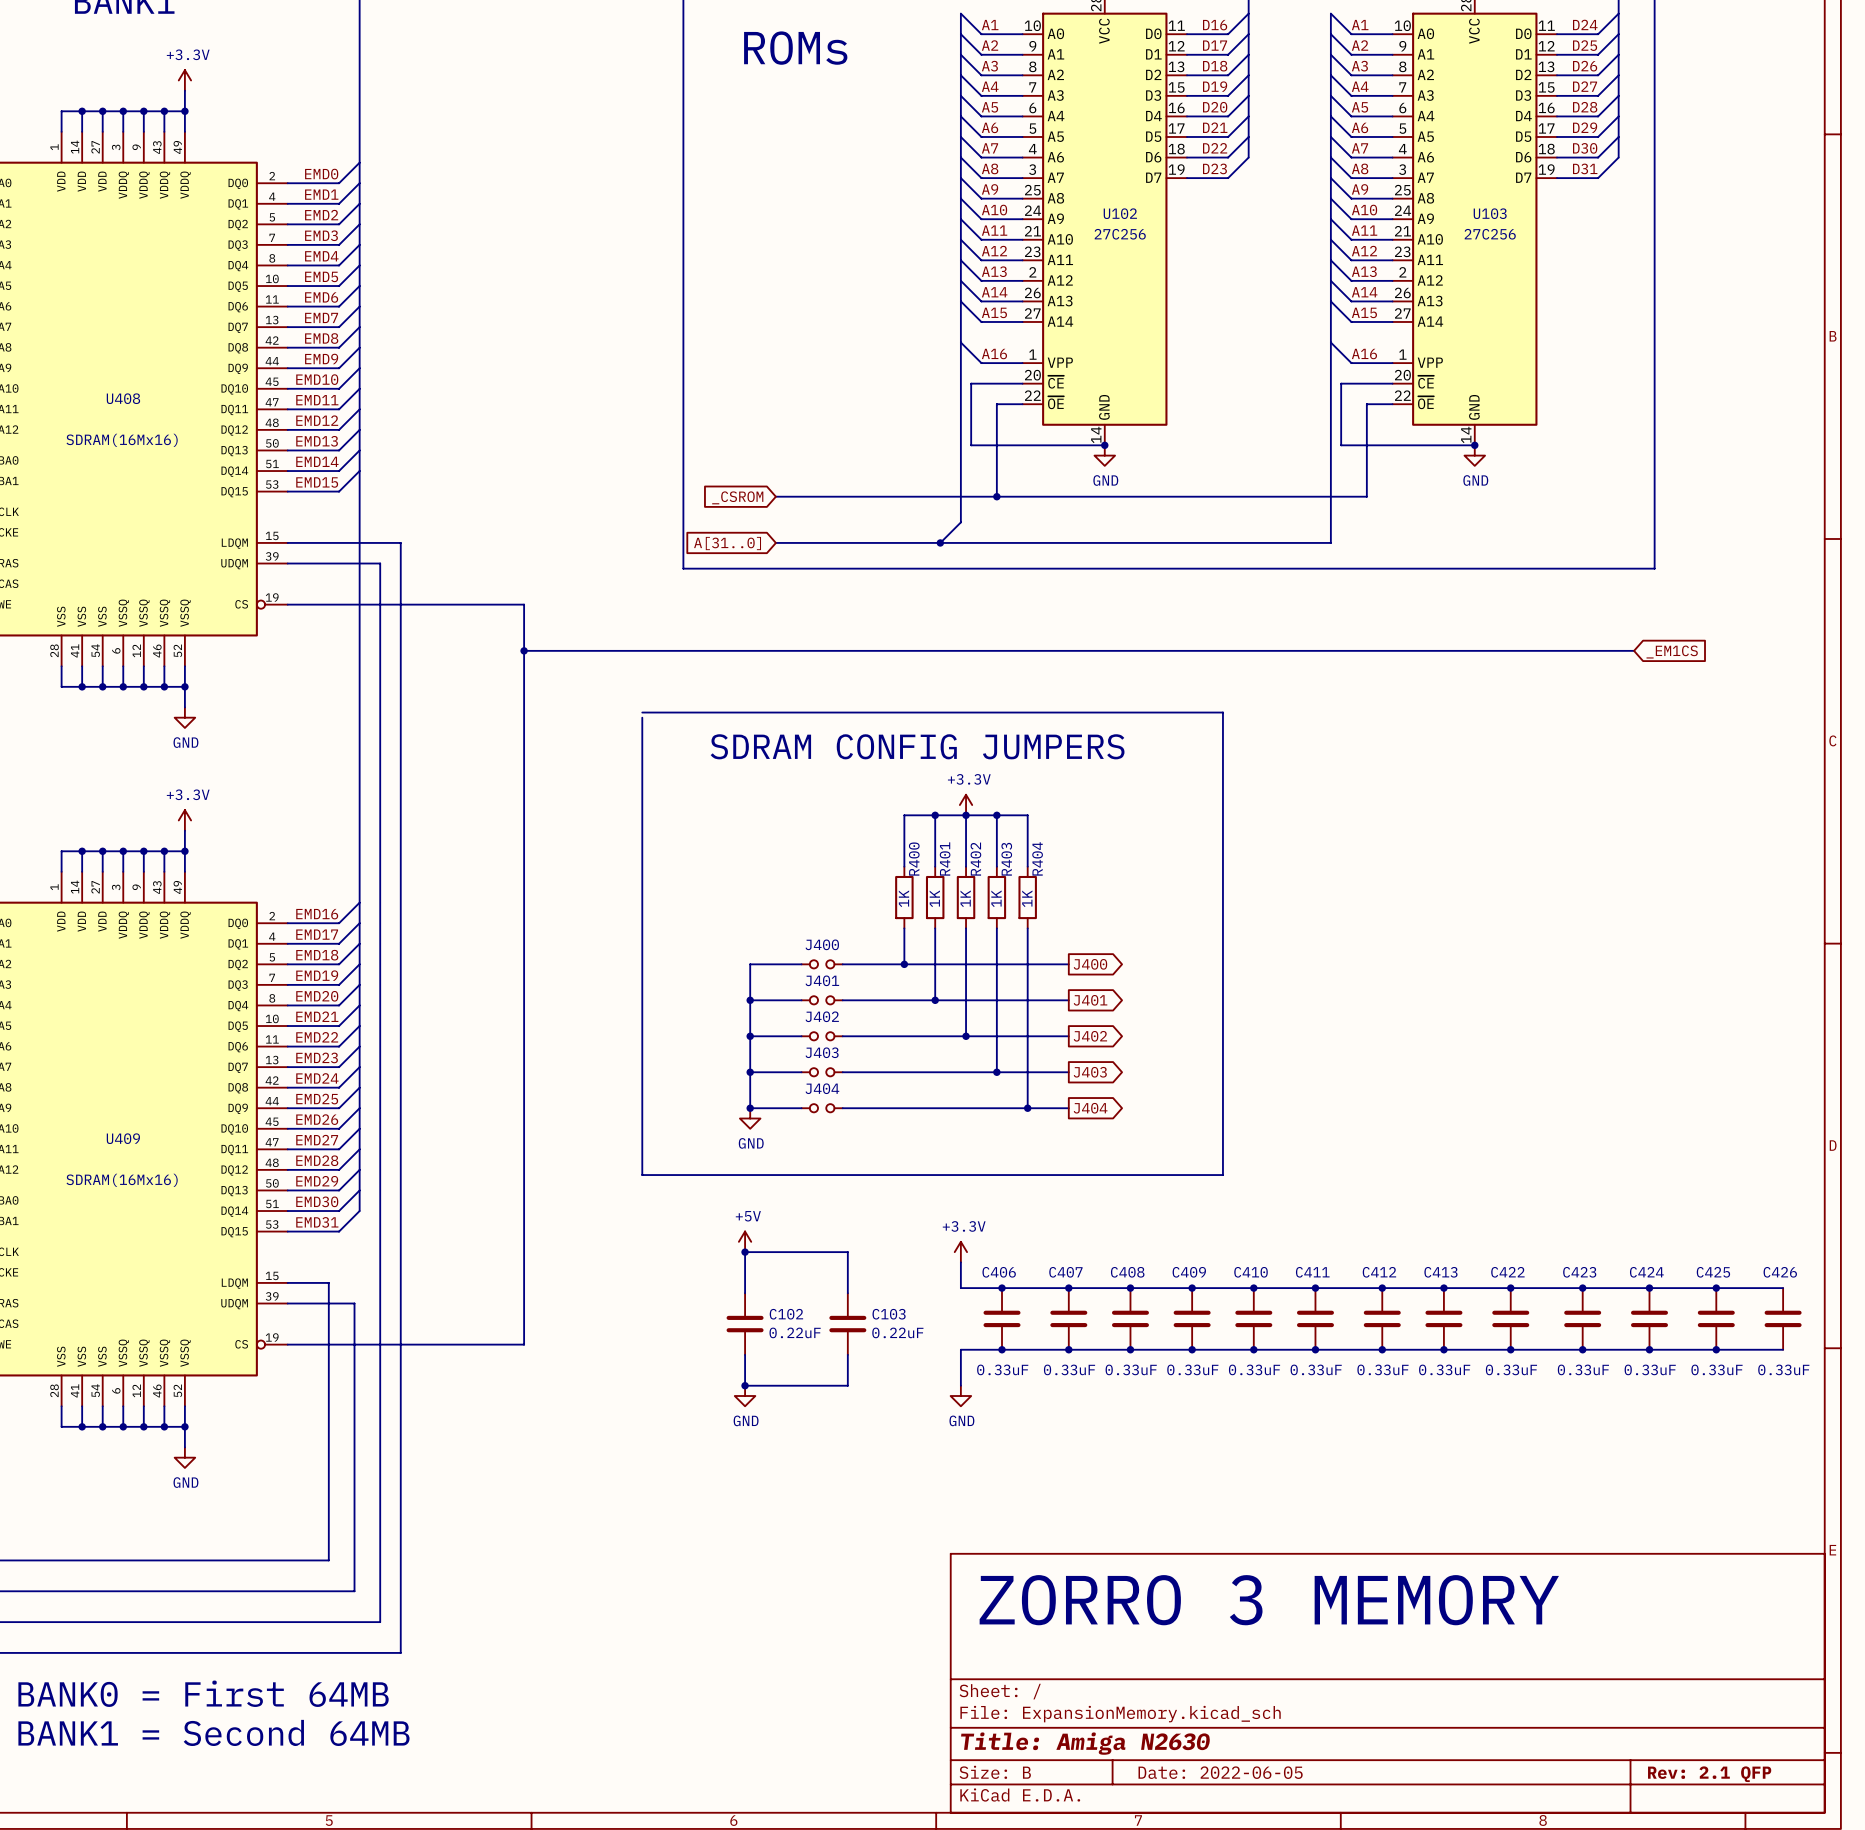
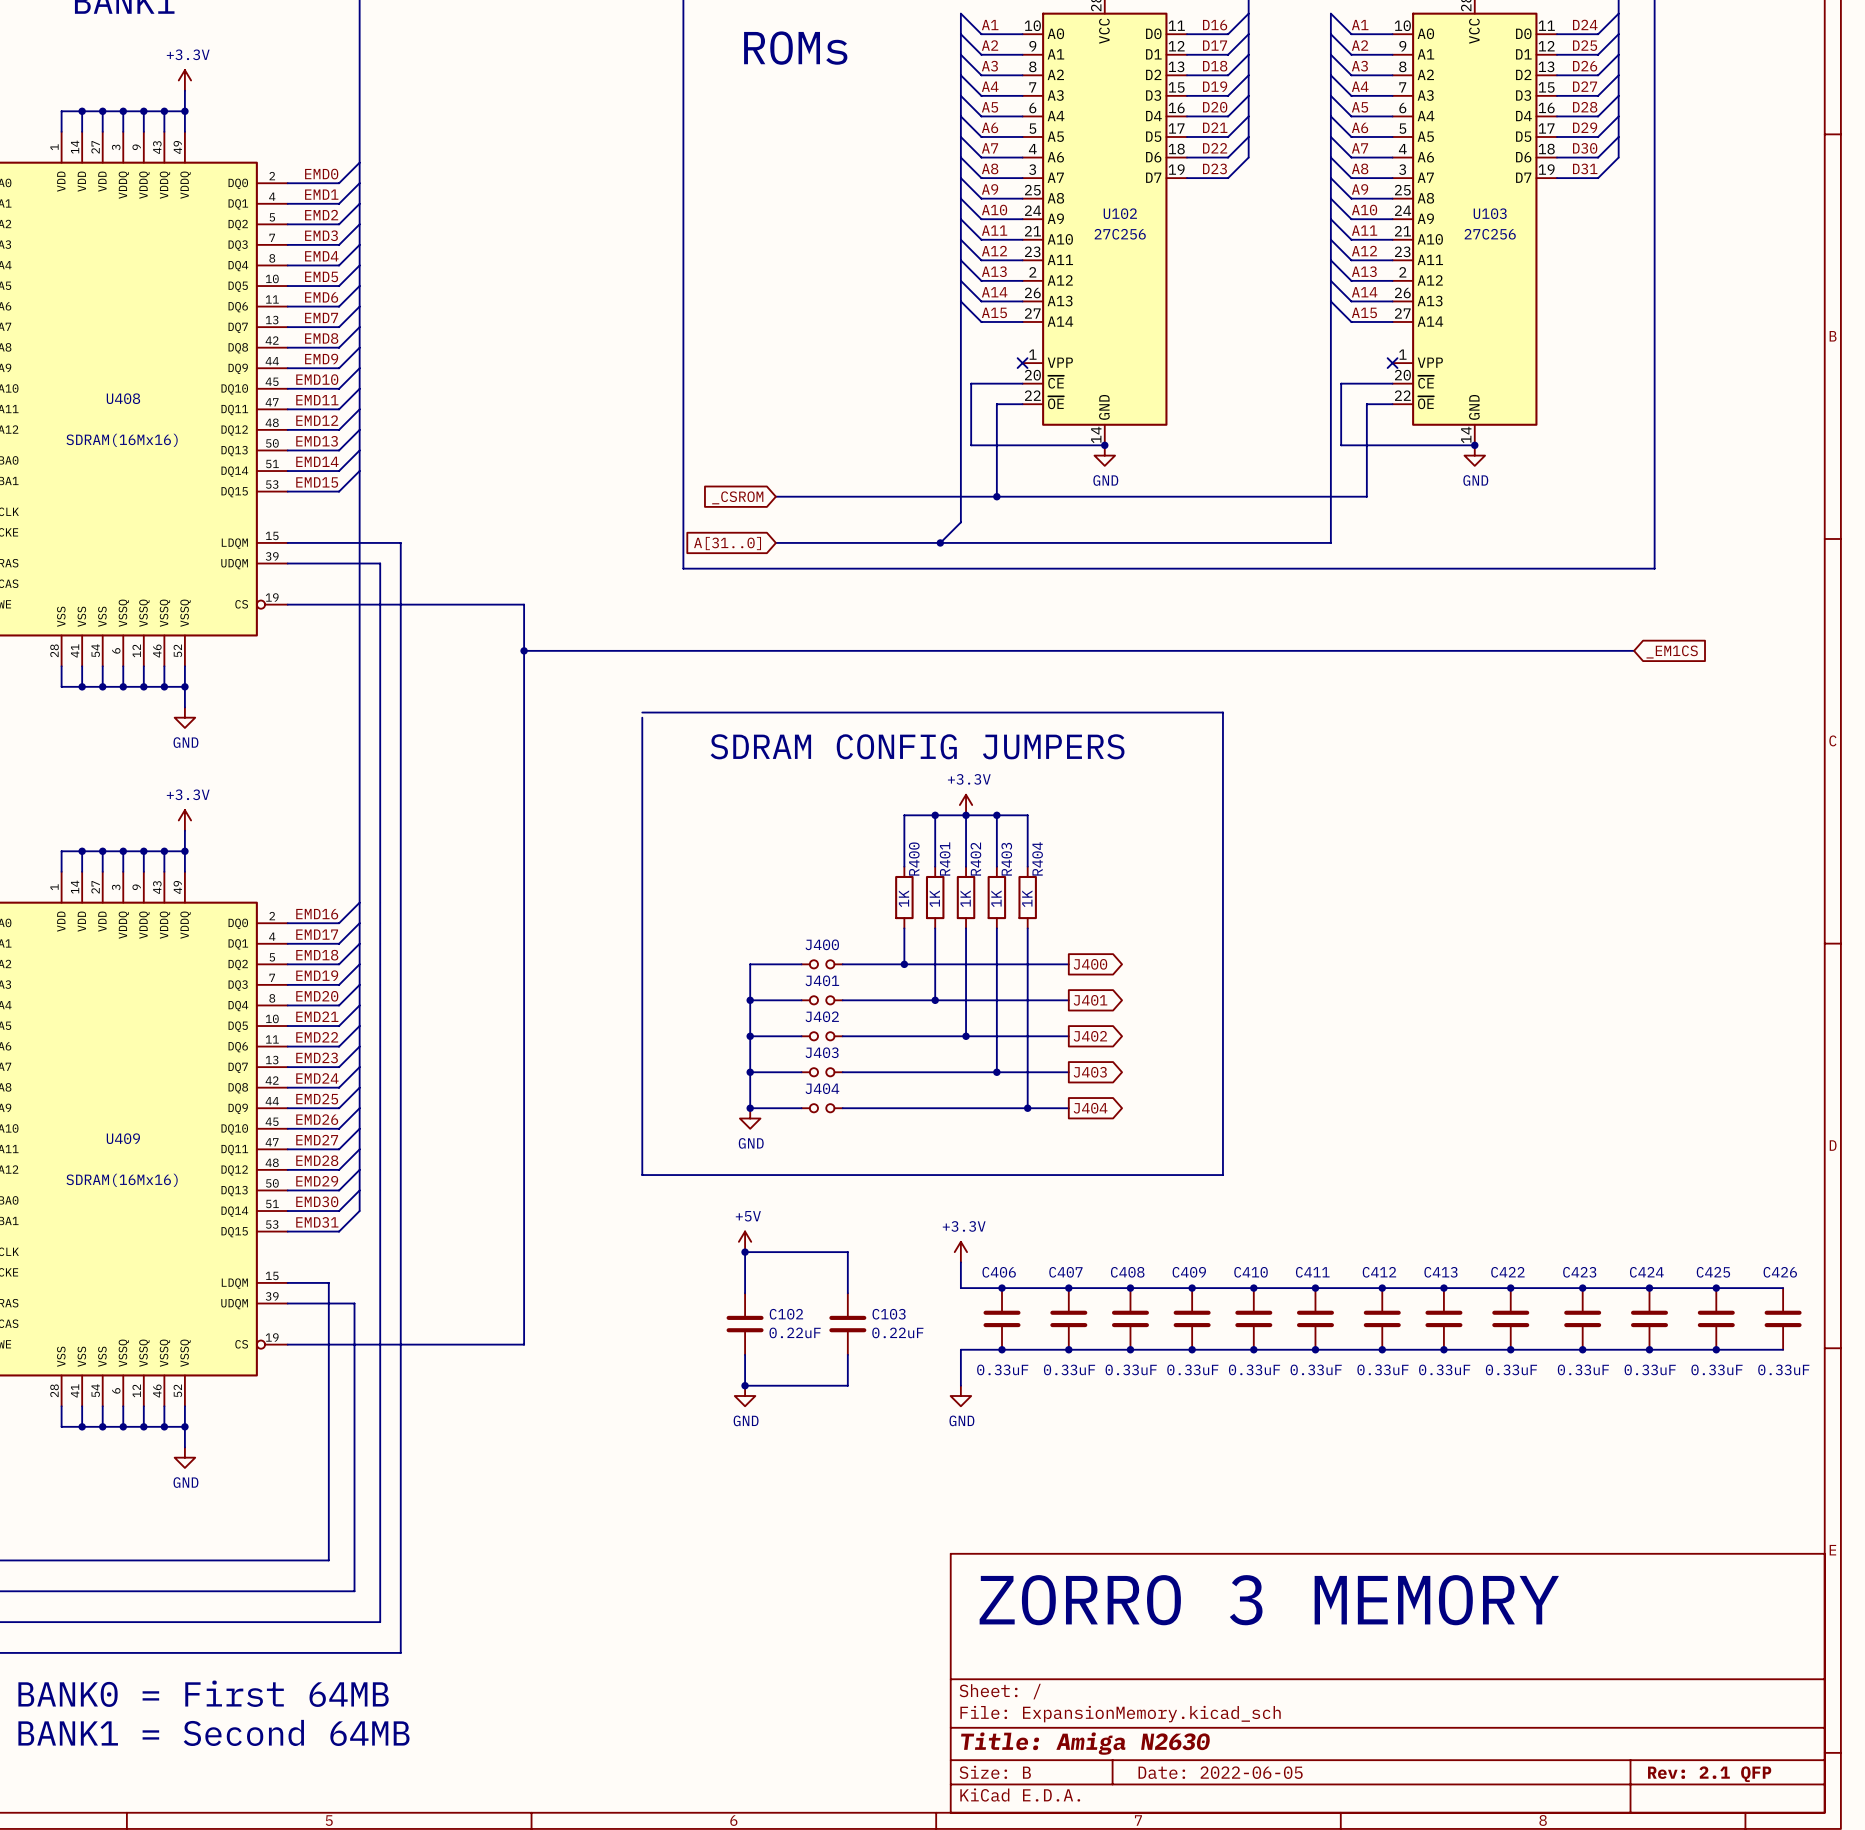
wire: (960, 342) (981, 363) (1022, 363) -> none
wire: (1330, 342) (1351, 363) (1392, 363) -> none
label: A16 (994, 354) -> none
label: A16 (1364, 354) -> none
no-connect mark: none -> (1022, 363)
no-connect mark: none -> (1392, 363)

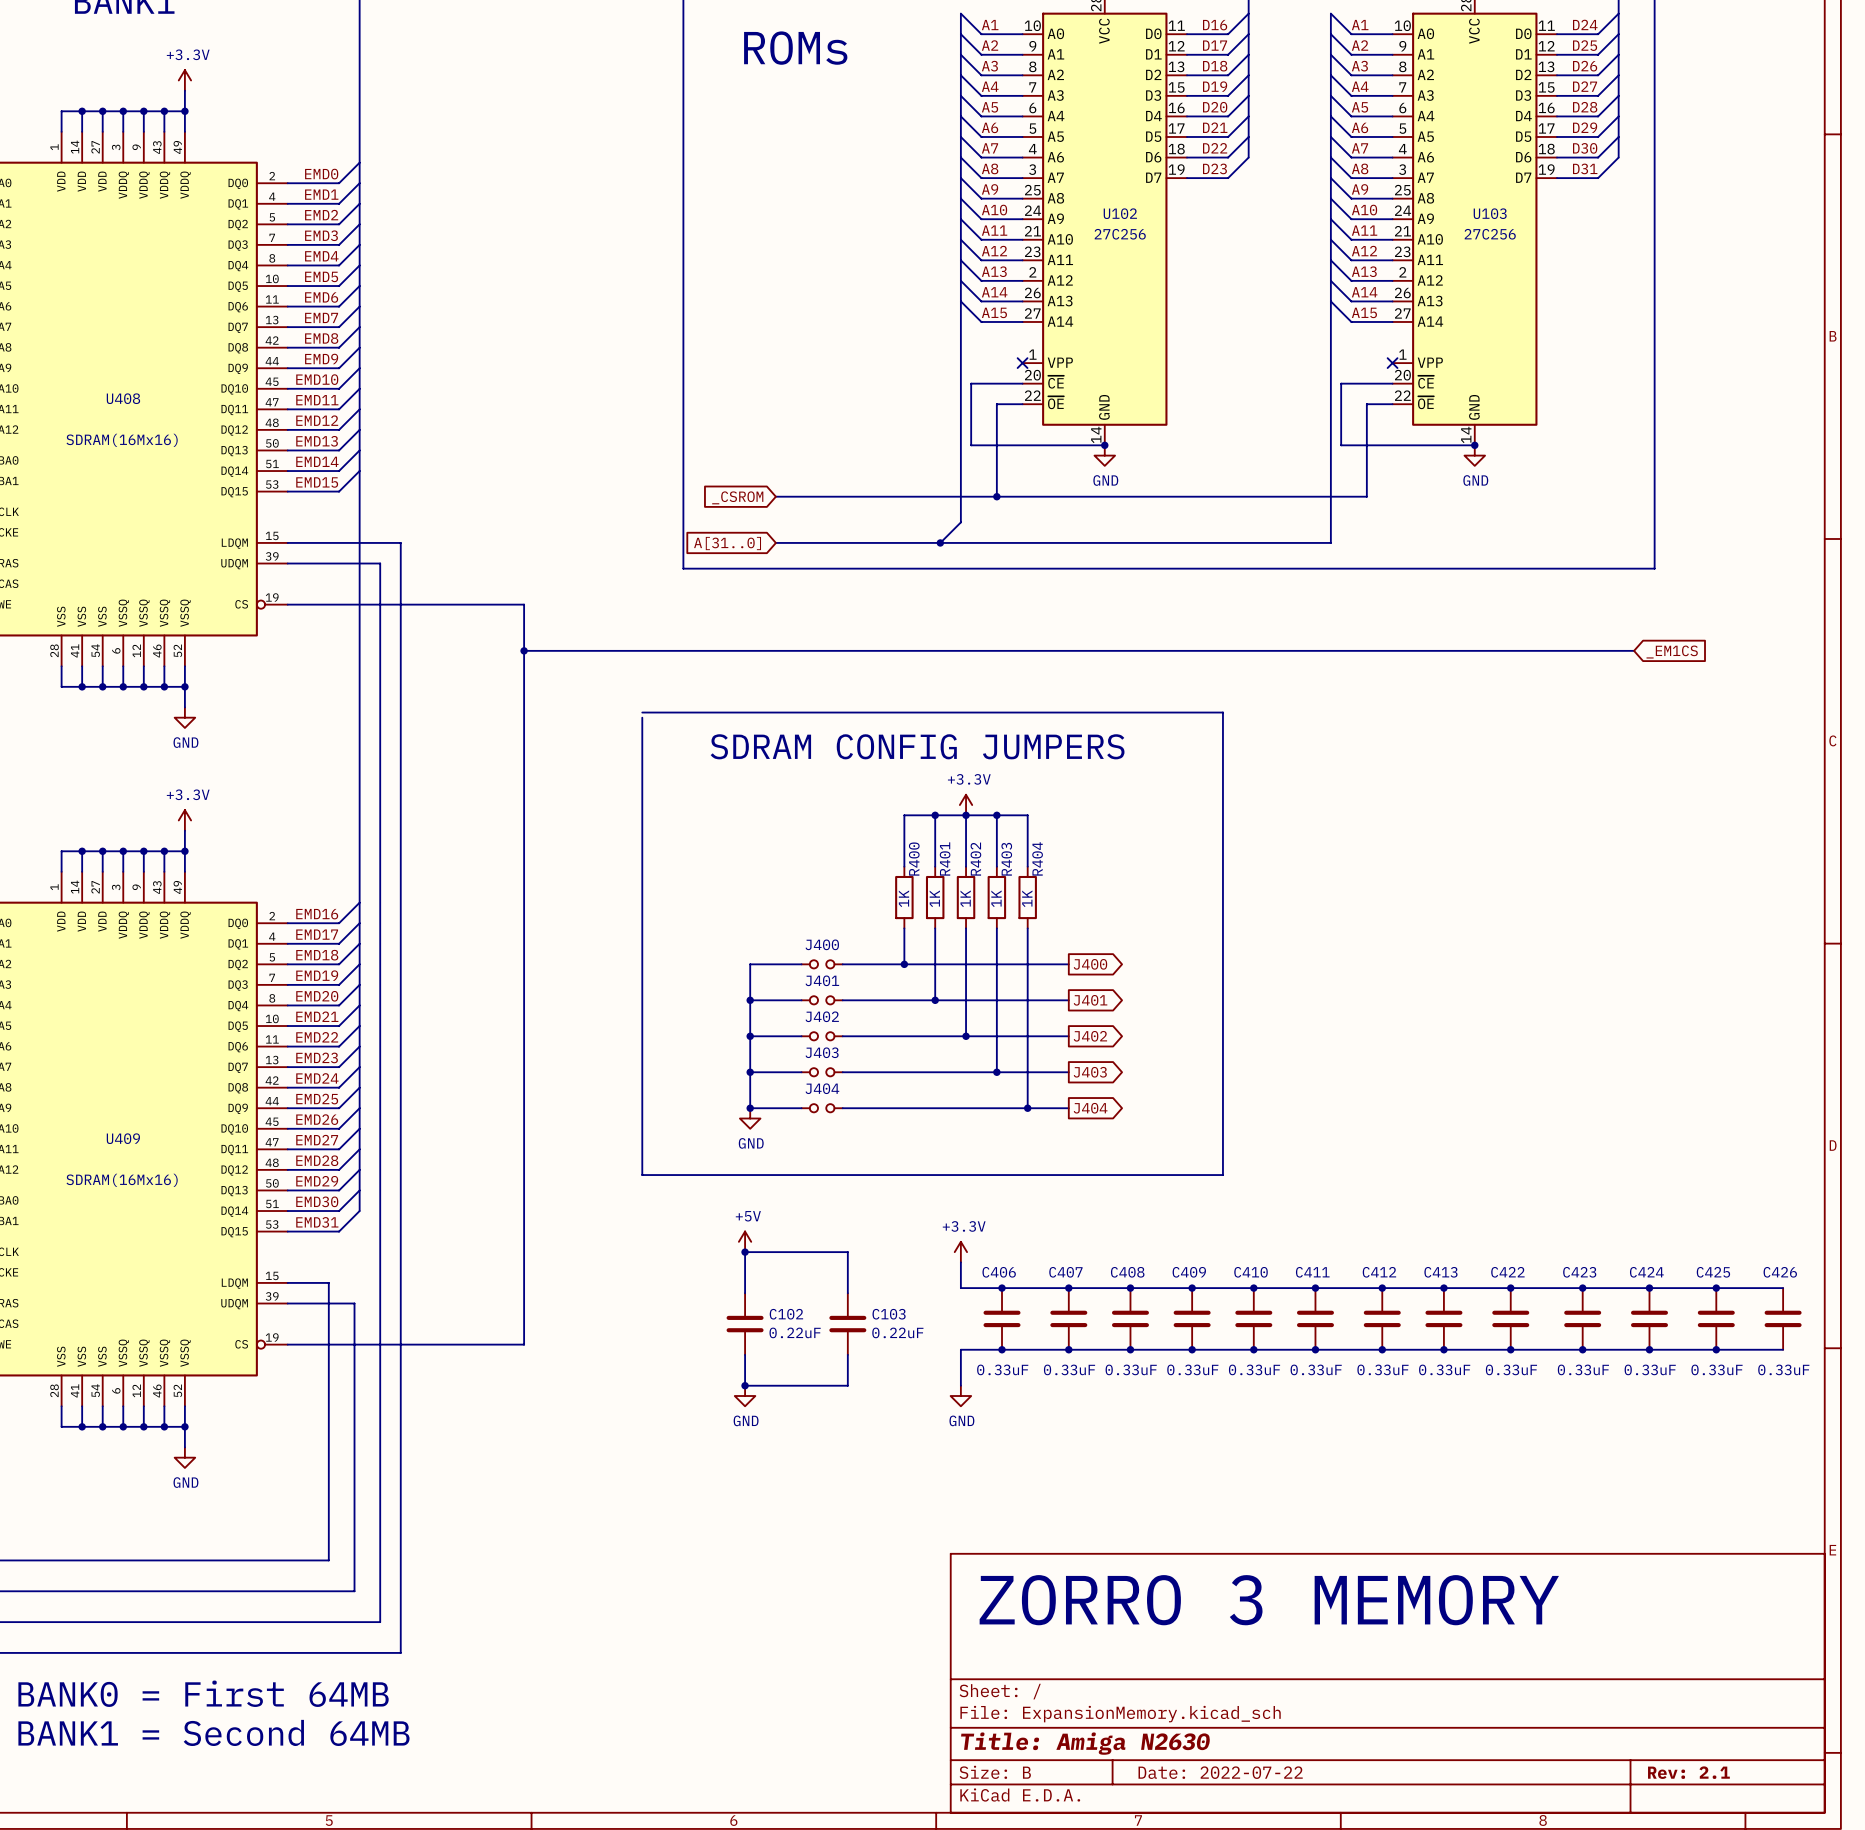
title block: Date: 2022-06-05 (1220, 1772) -> Date: 2022-07-22 (1220, 1772)
title block: Rev: 2.1 QFP (1709, 1774) -> Rev: 2.1 (1688, 1772)

